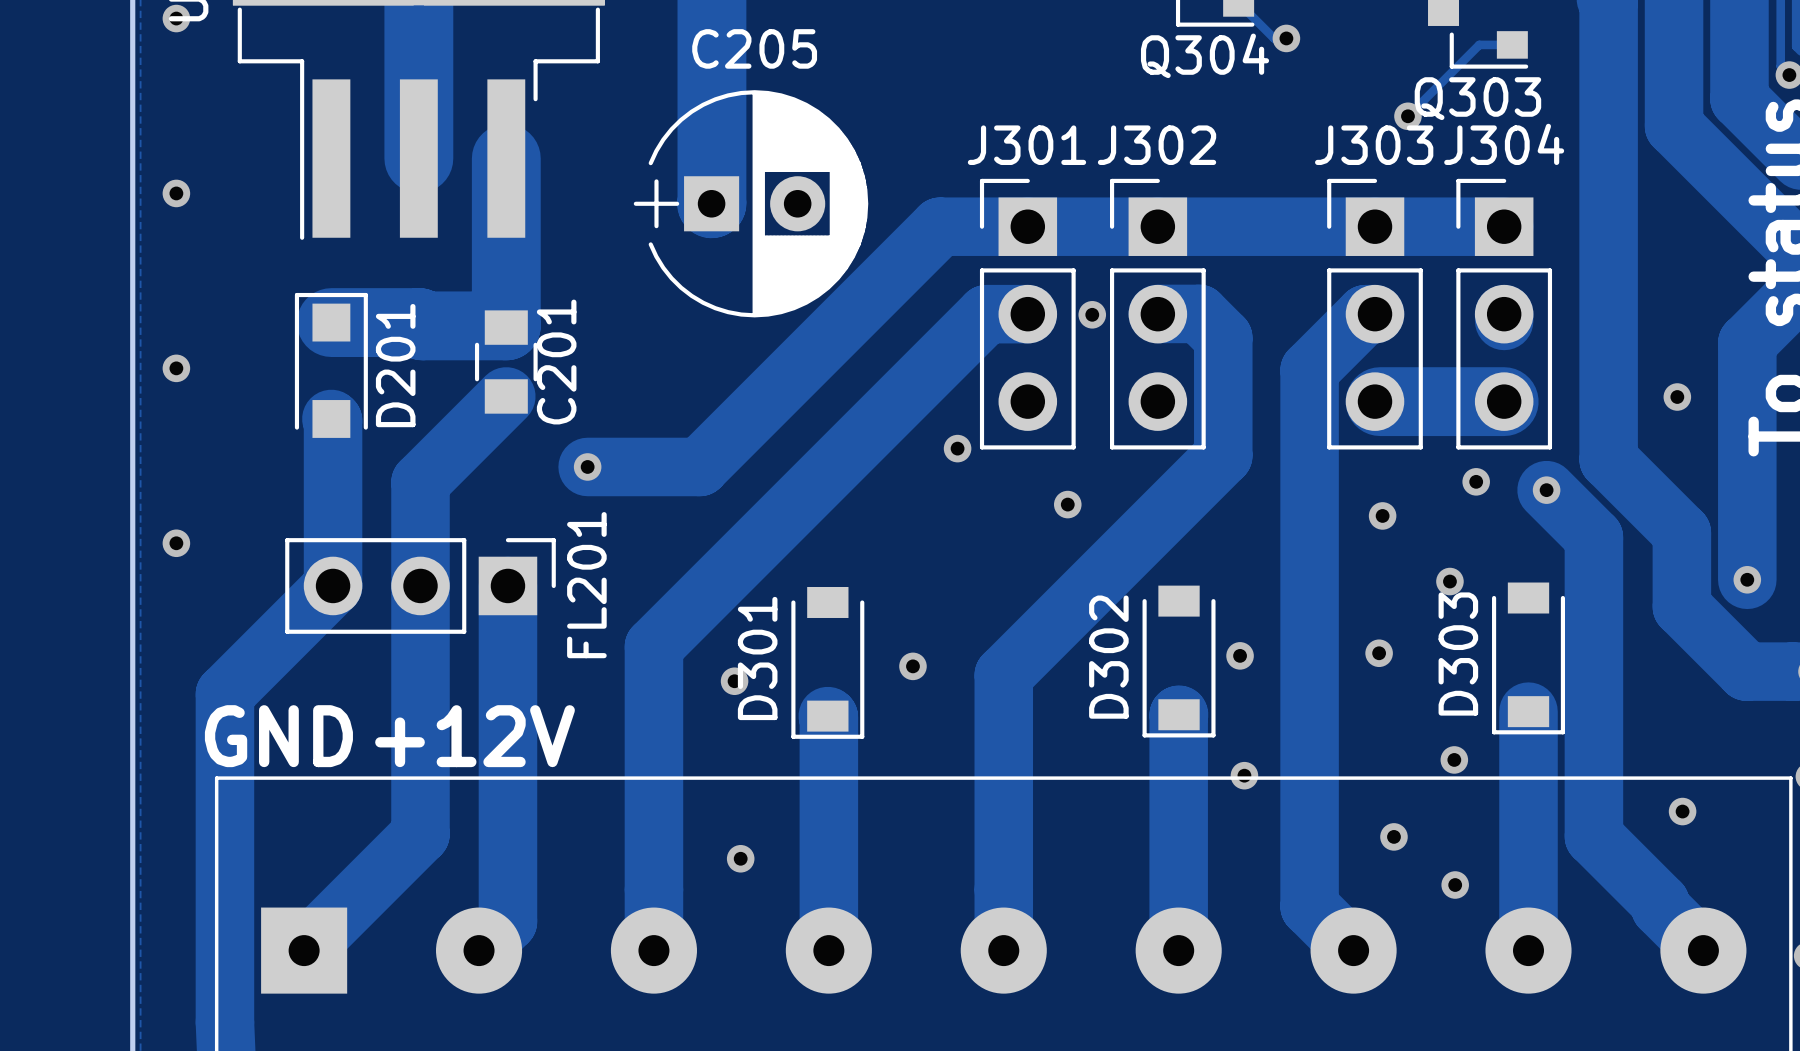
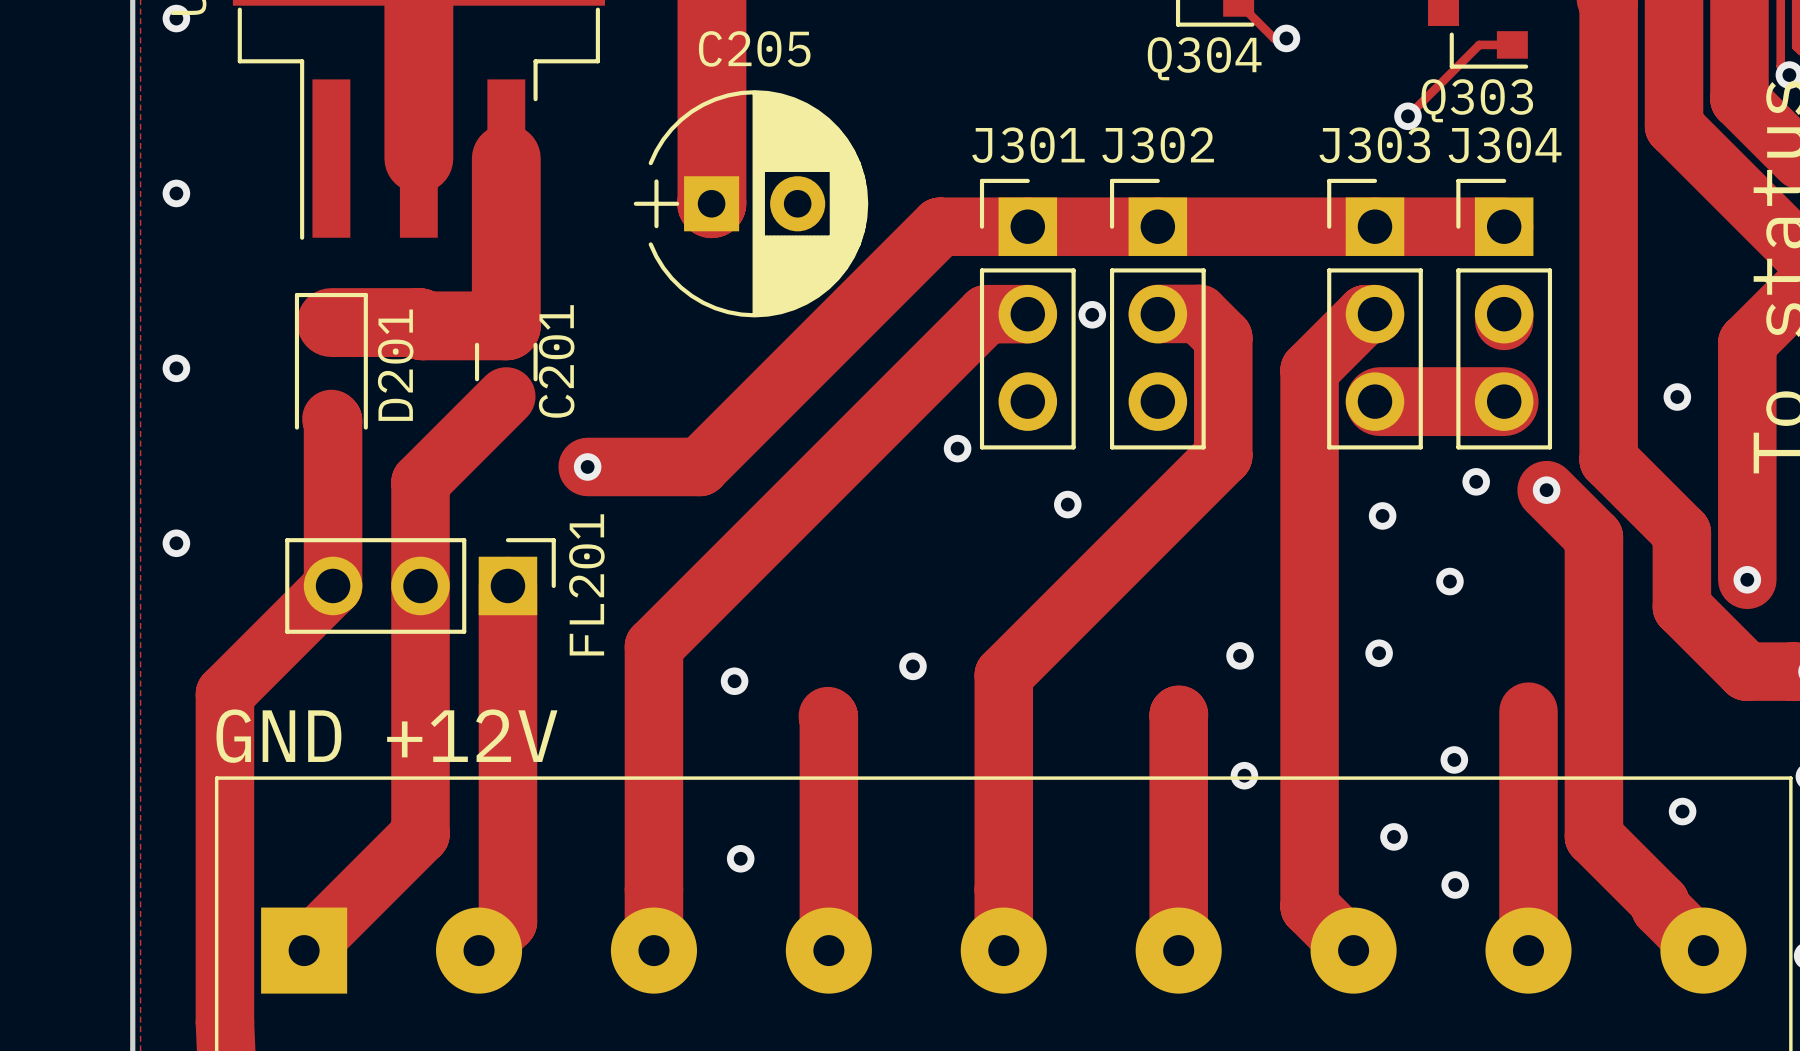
D303: (1528, 658) -> none
D302: (1179, 661) -> none
D301: (827, 662) -> none

